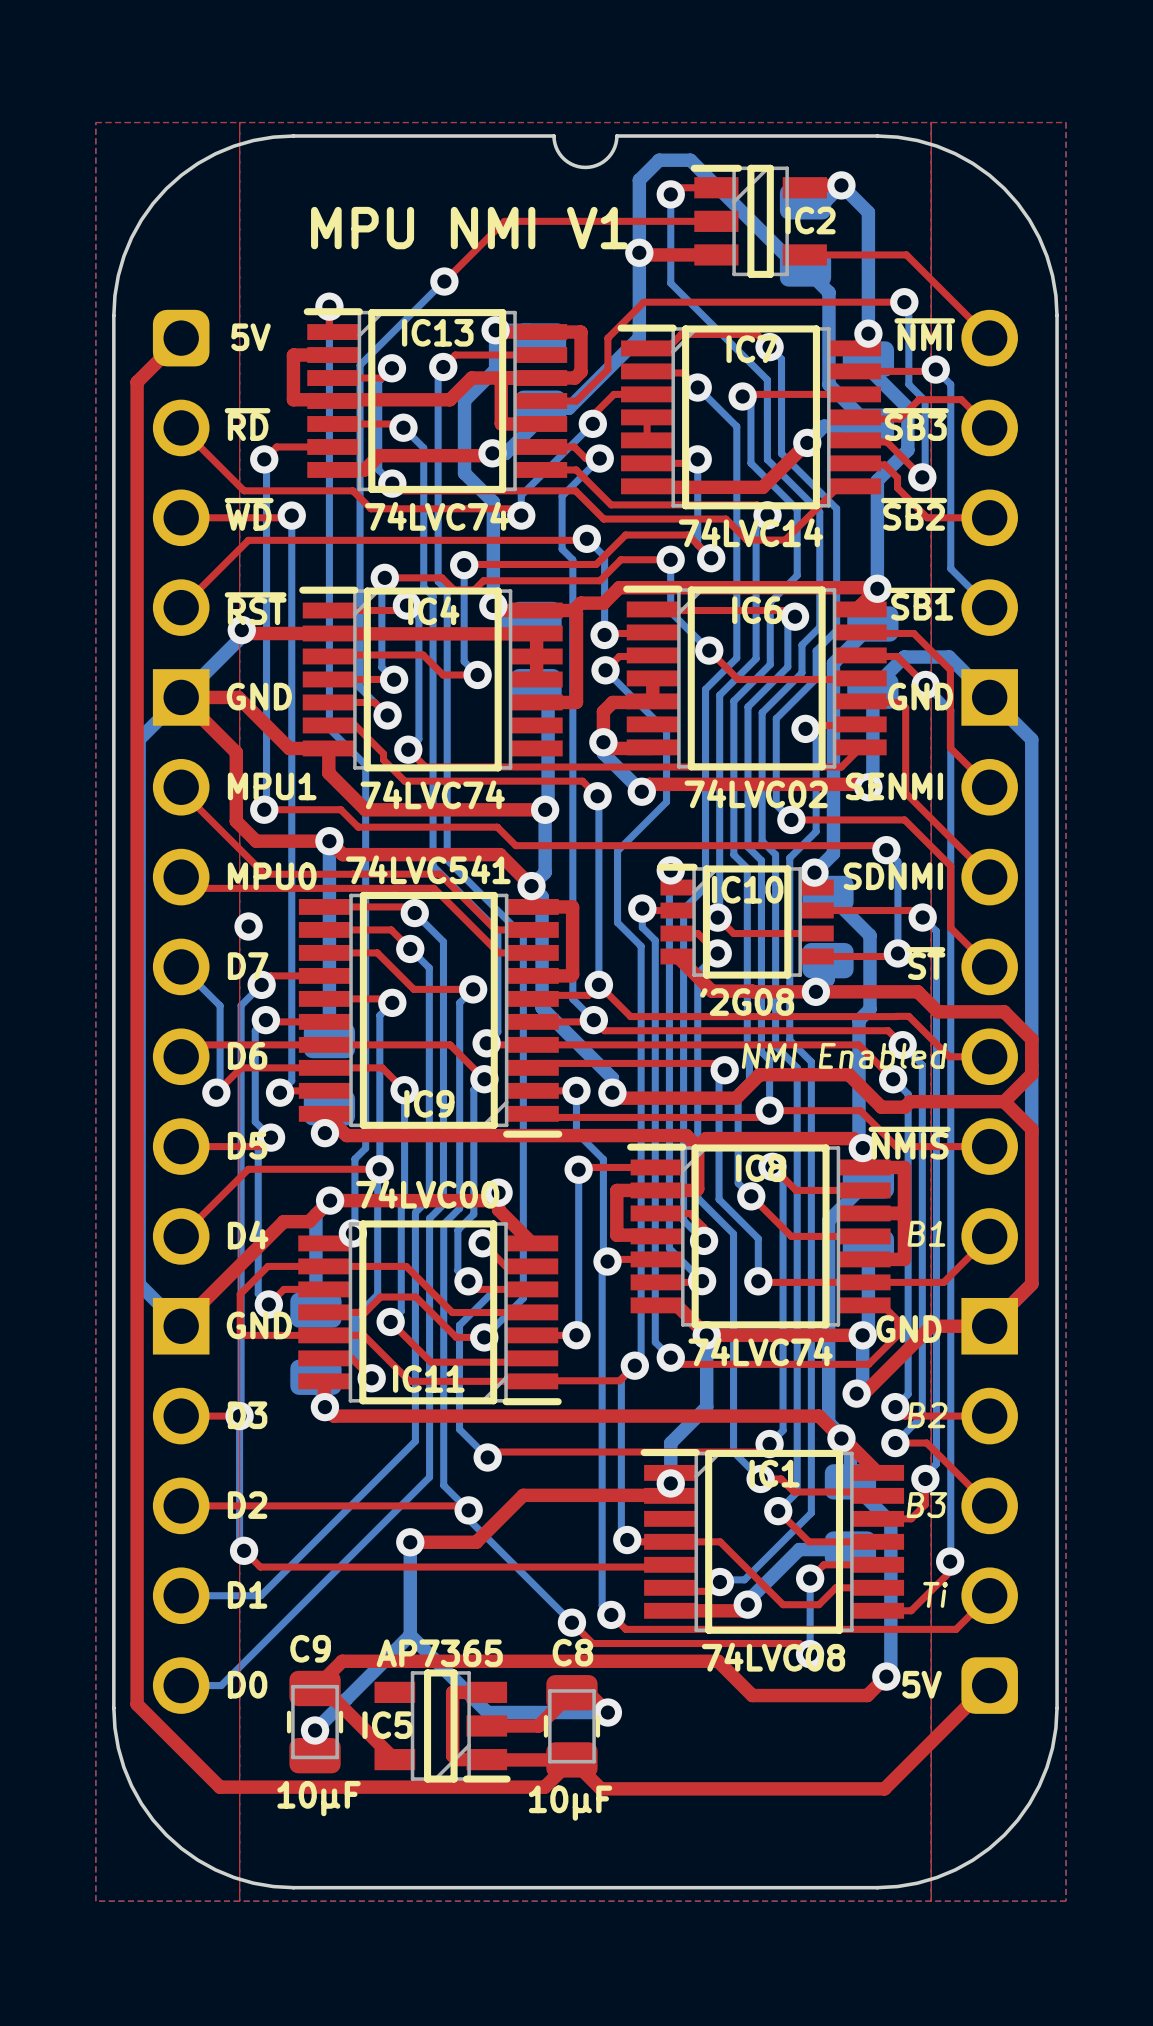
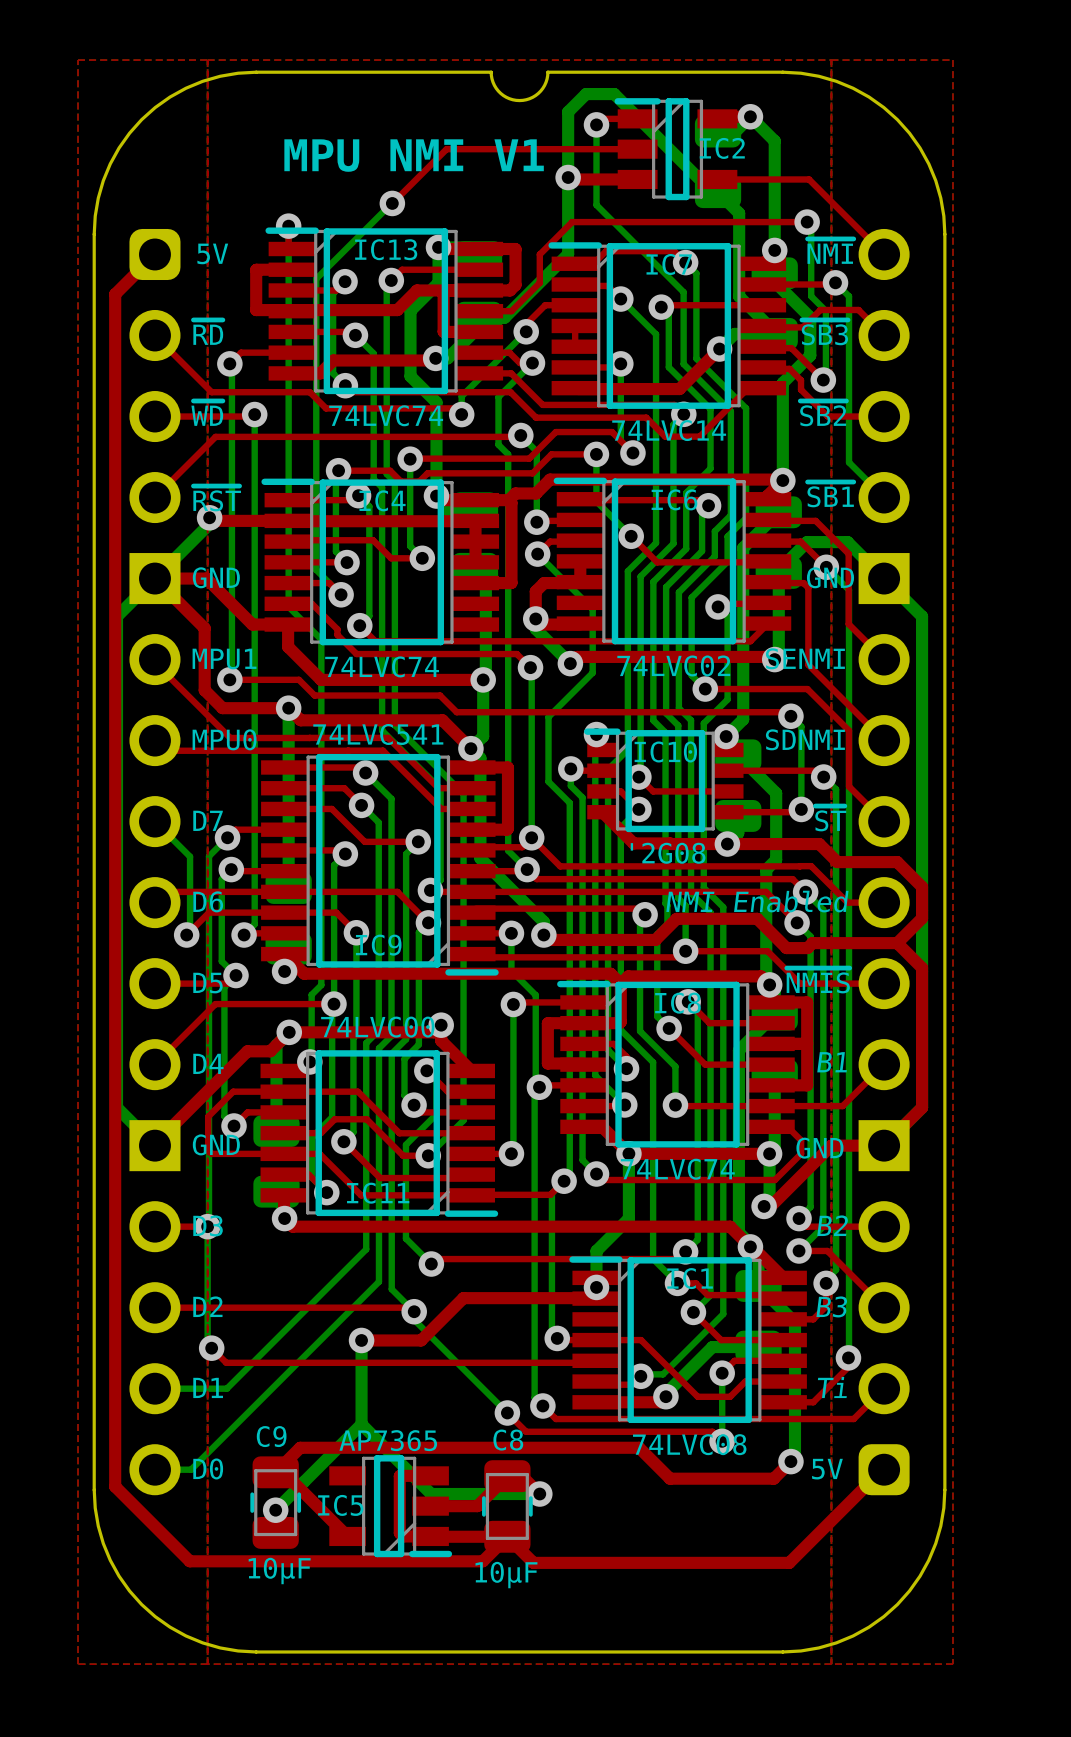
via: (248, 926) -> none

